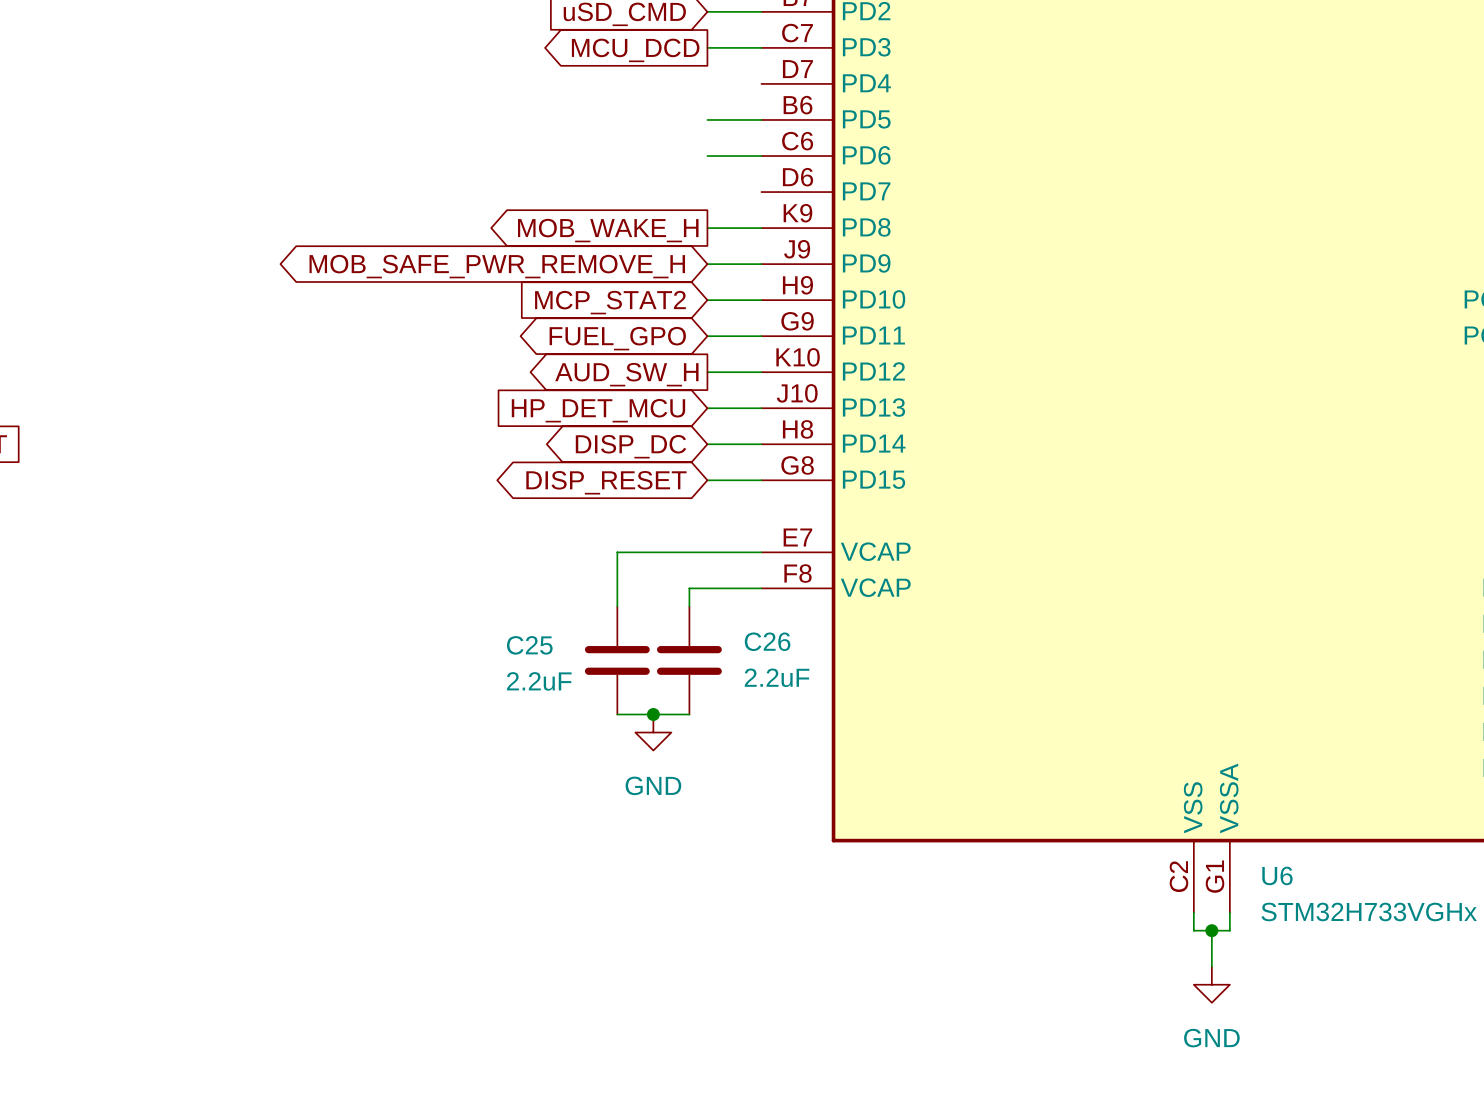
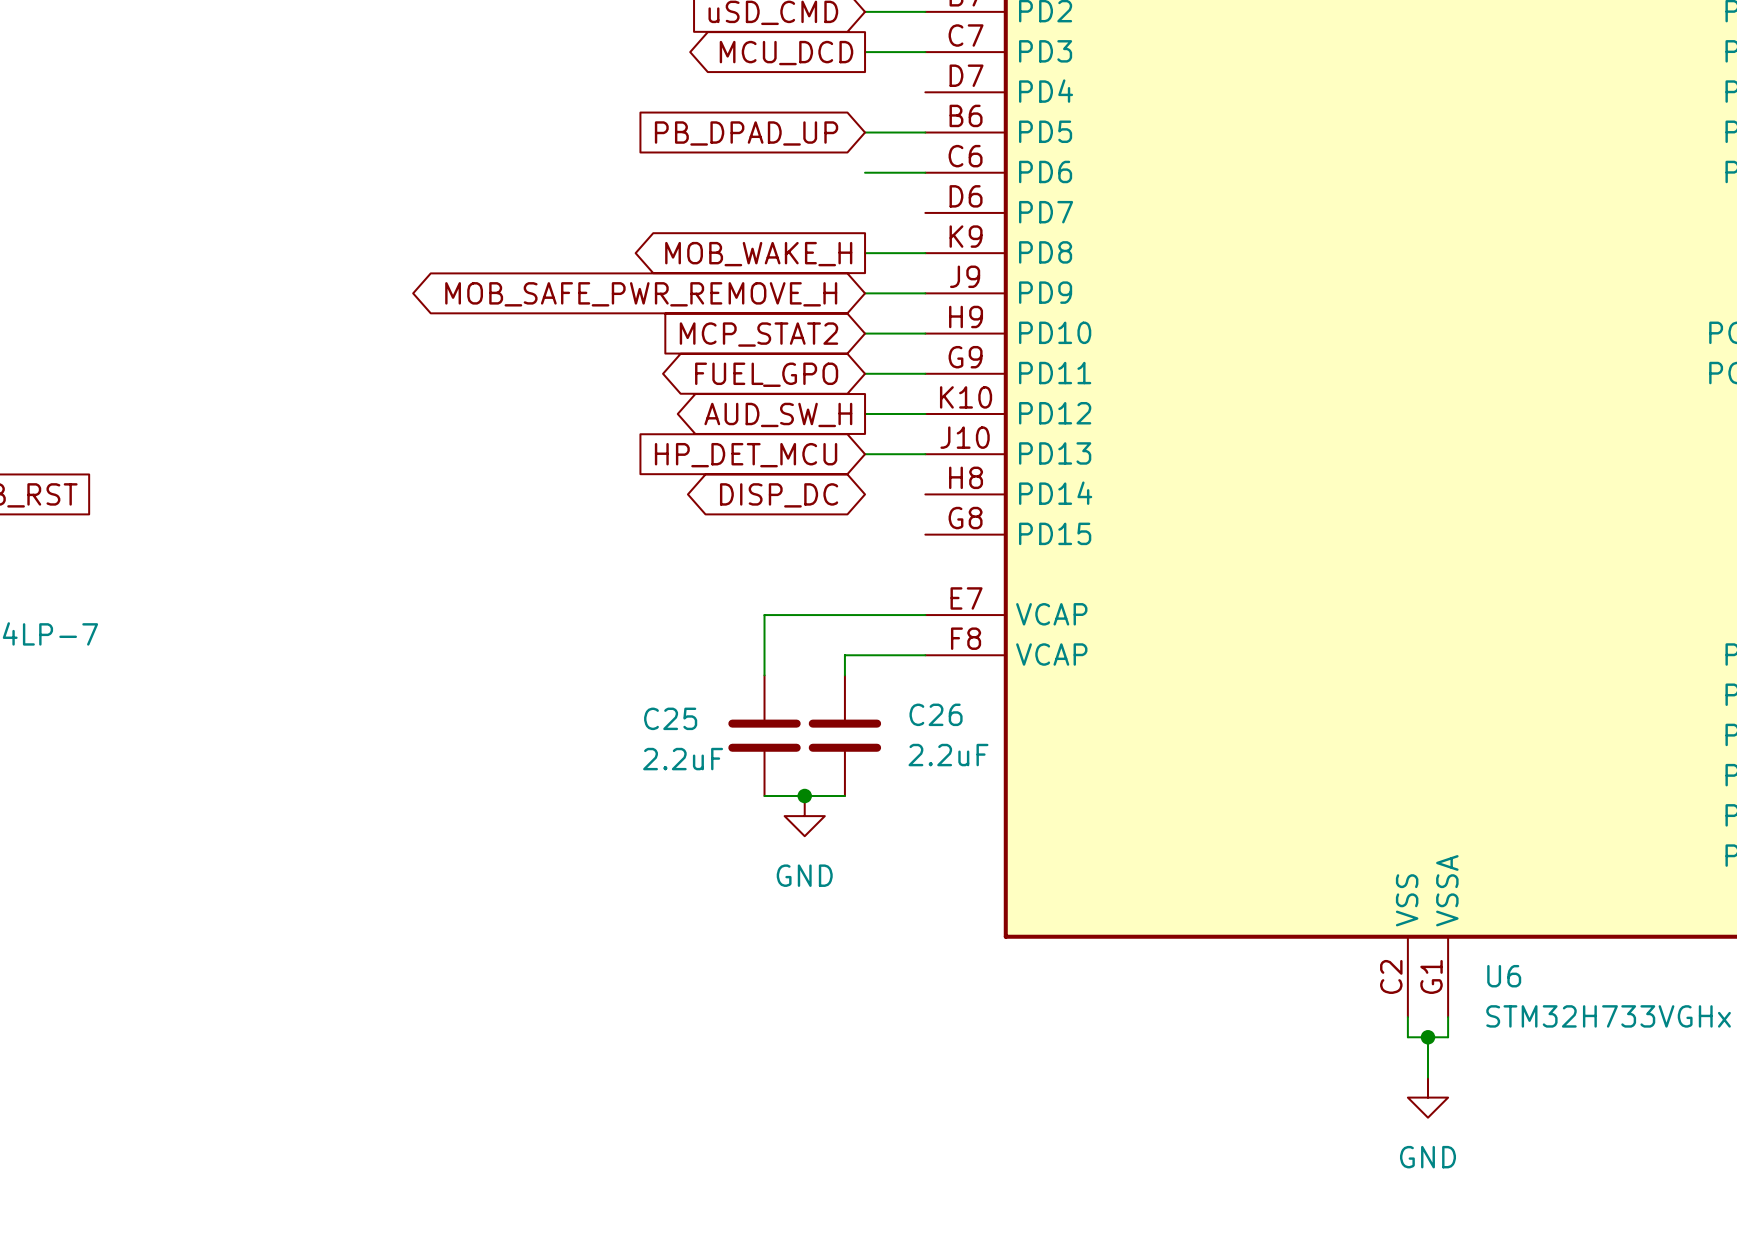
global label: none -> PB_DPAD_UP (746, 133)
wire: (707, 444) (761, 444) -> none
wire: (707, 480) (761, 480) -> none
global label: DISP_RESET (606, 482) -> none

